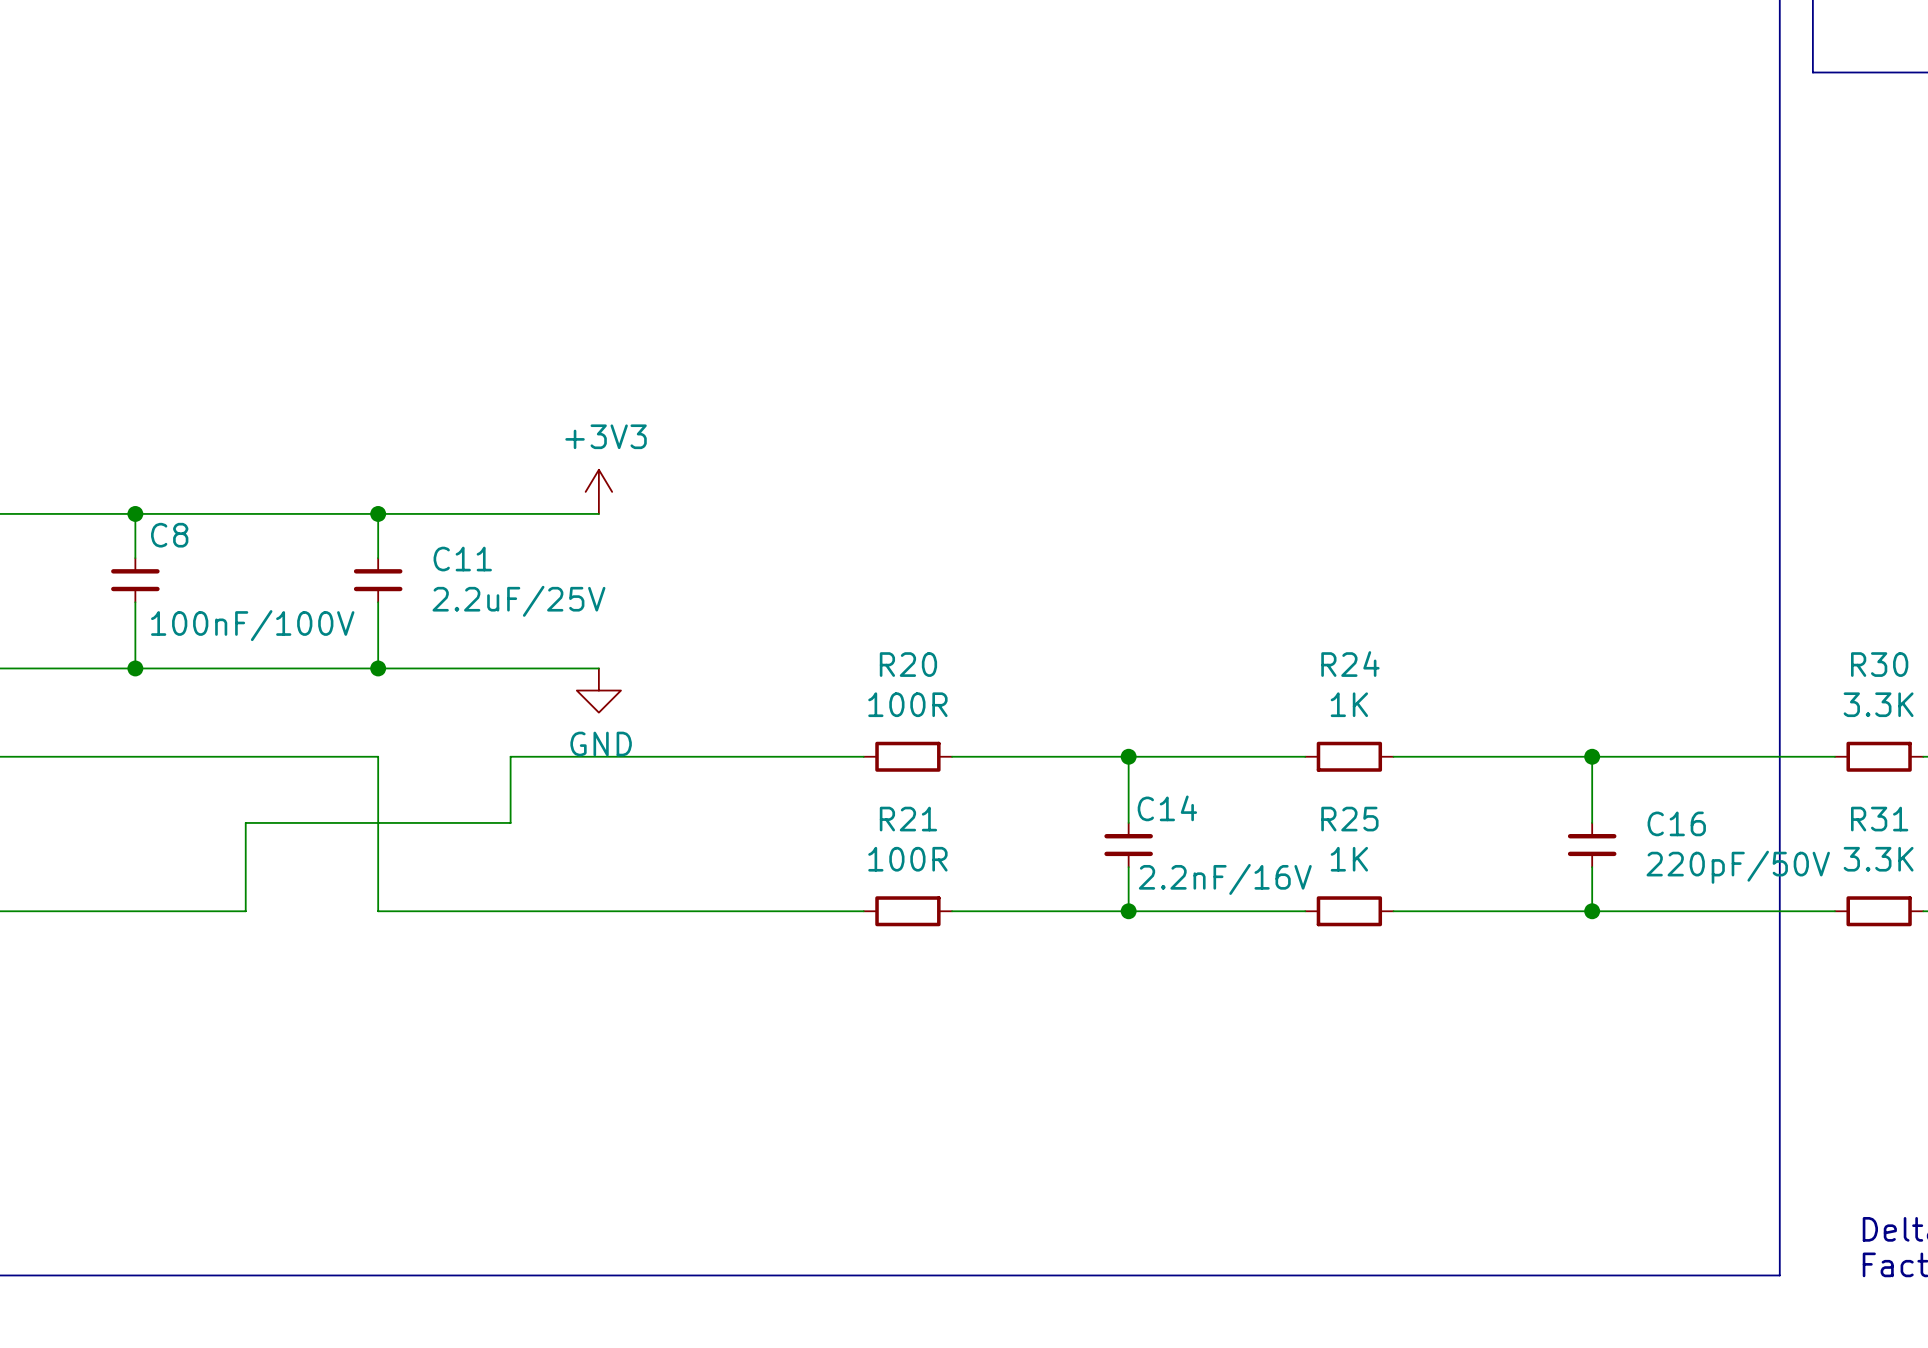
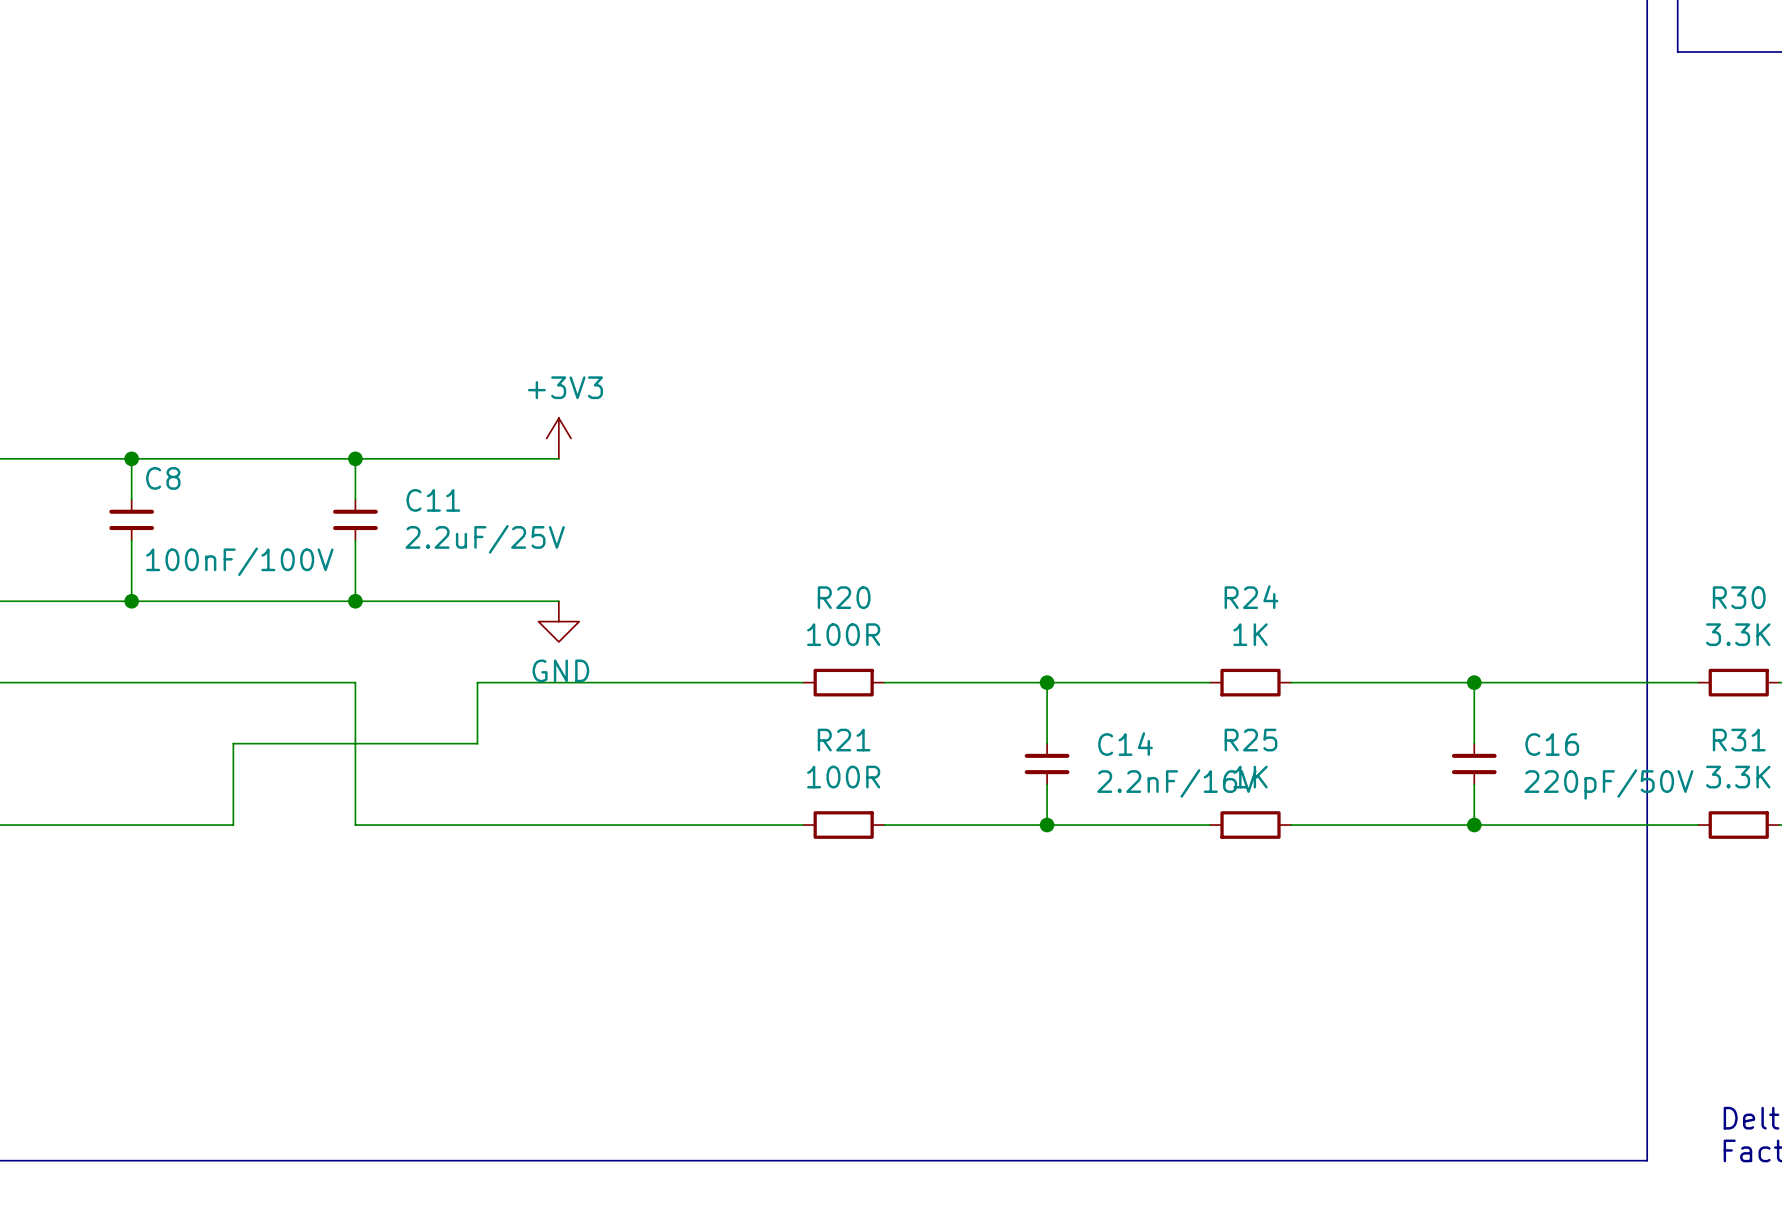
C14 name position: C14 (1167, 808) -> C14 (1125, 744)
C14 value position: 2.2nF/16V (1225, 879) -> 2.2nF/16V (1176, 783)

